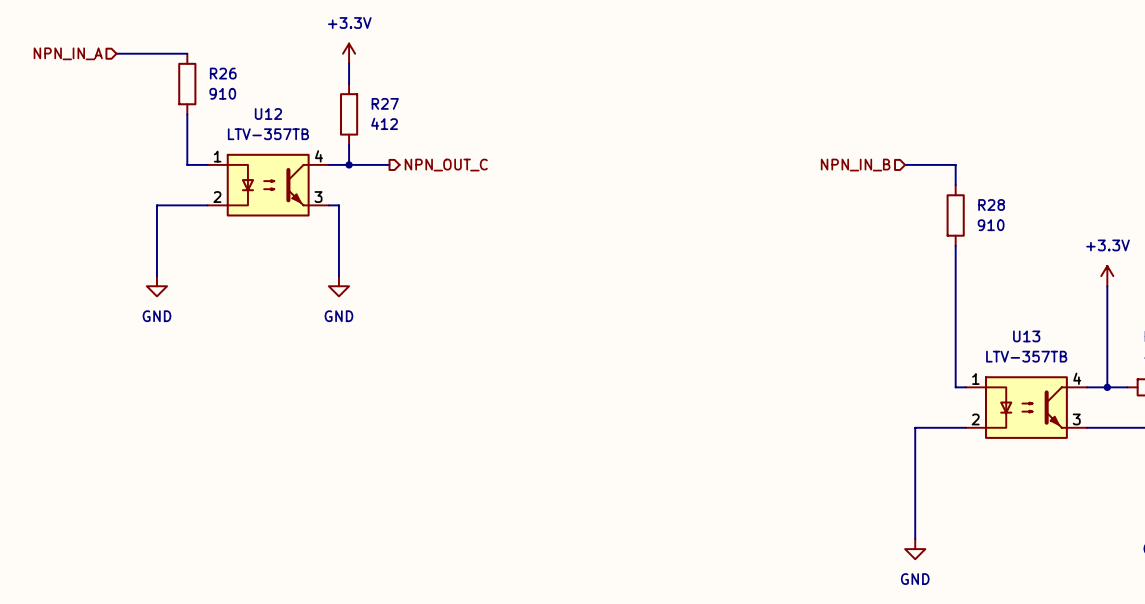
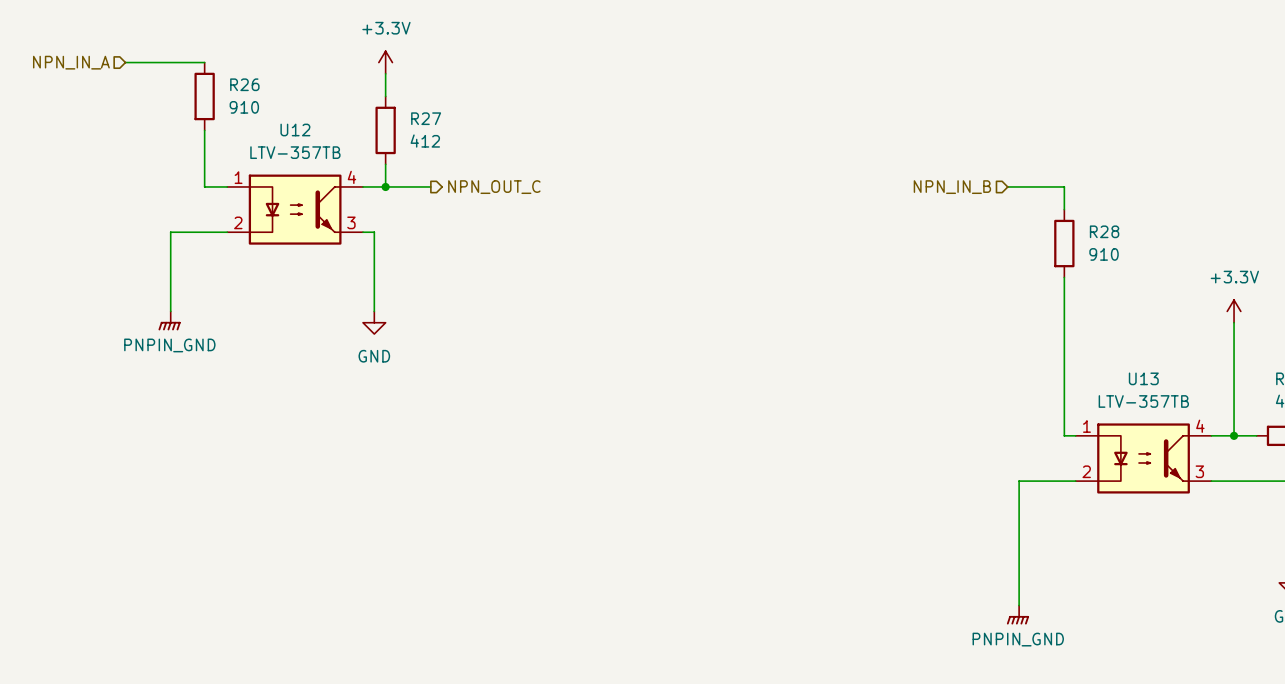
power symbol: GND (156, 286) -> PNPIN_GND (169, 320)
power symbol: GND (915, 549) -> PNPIN_GND (1017, 615)

